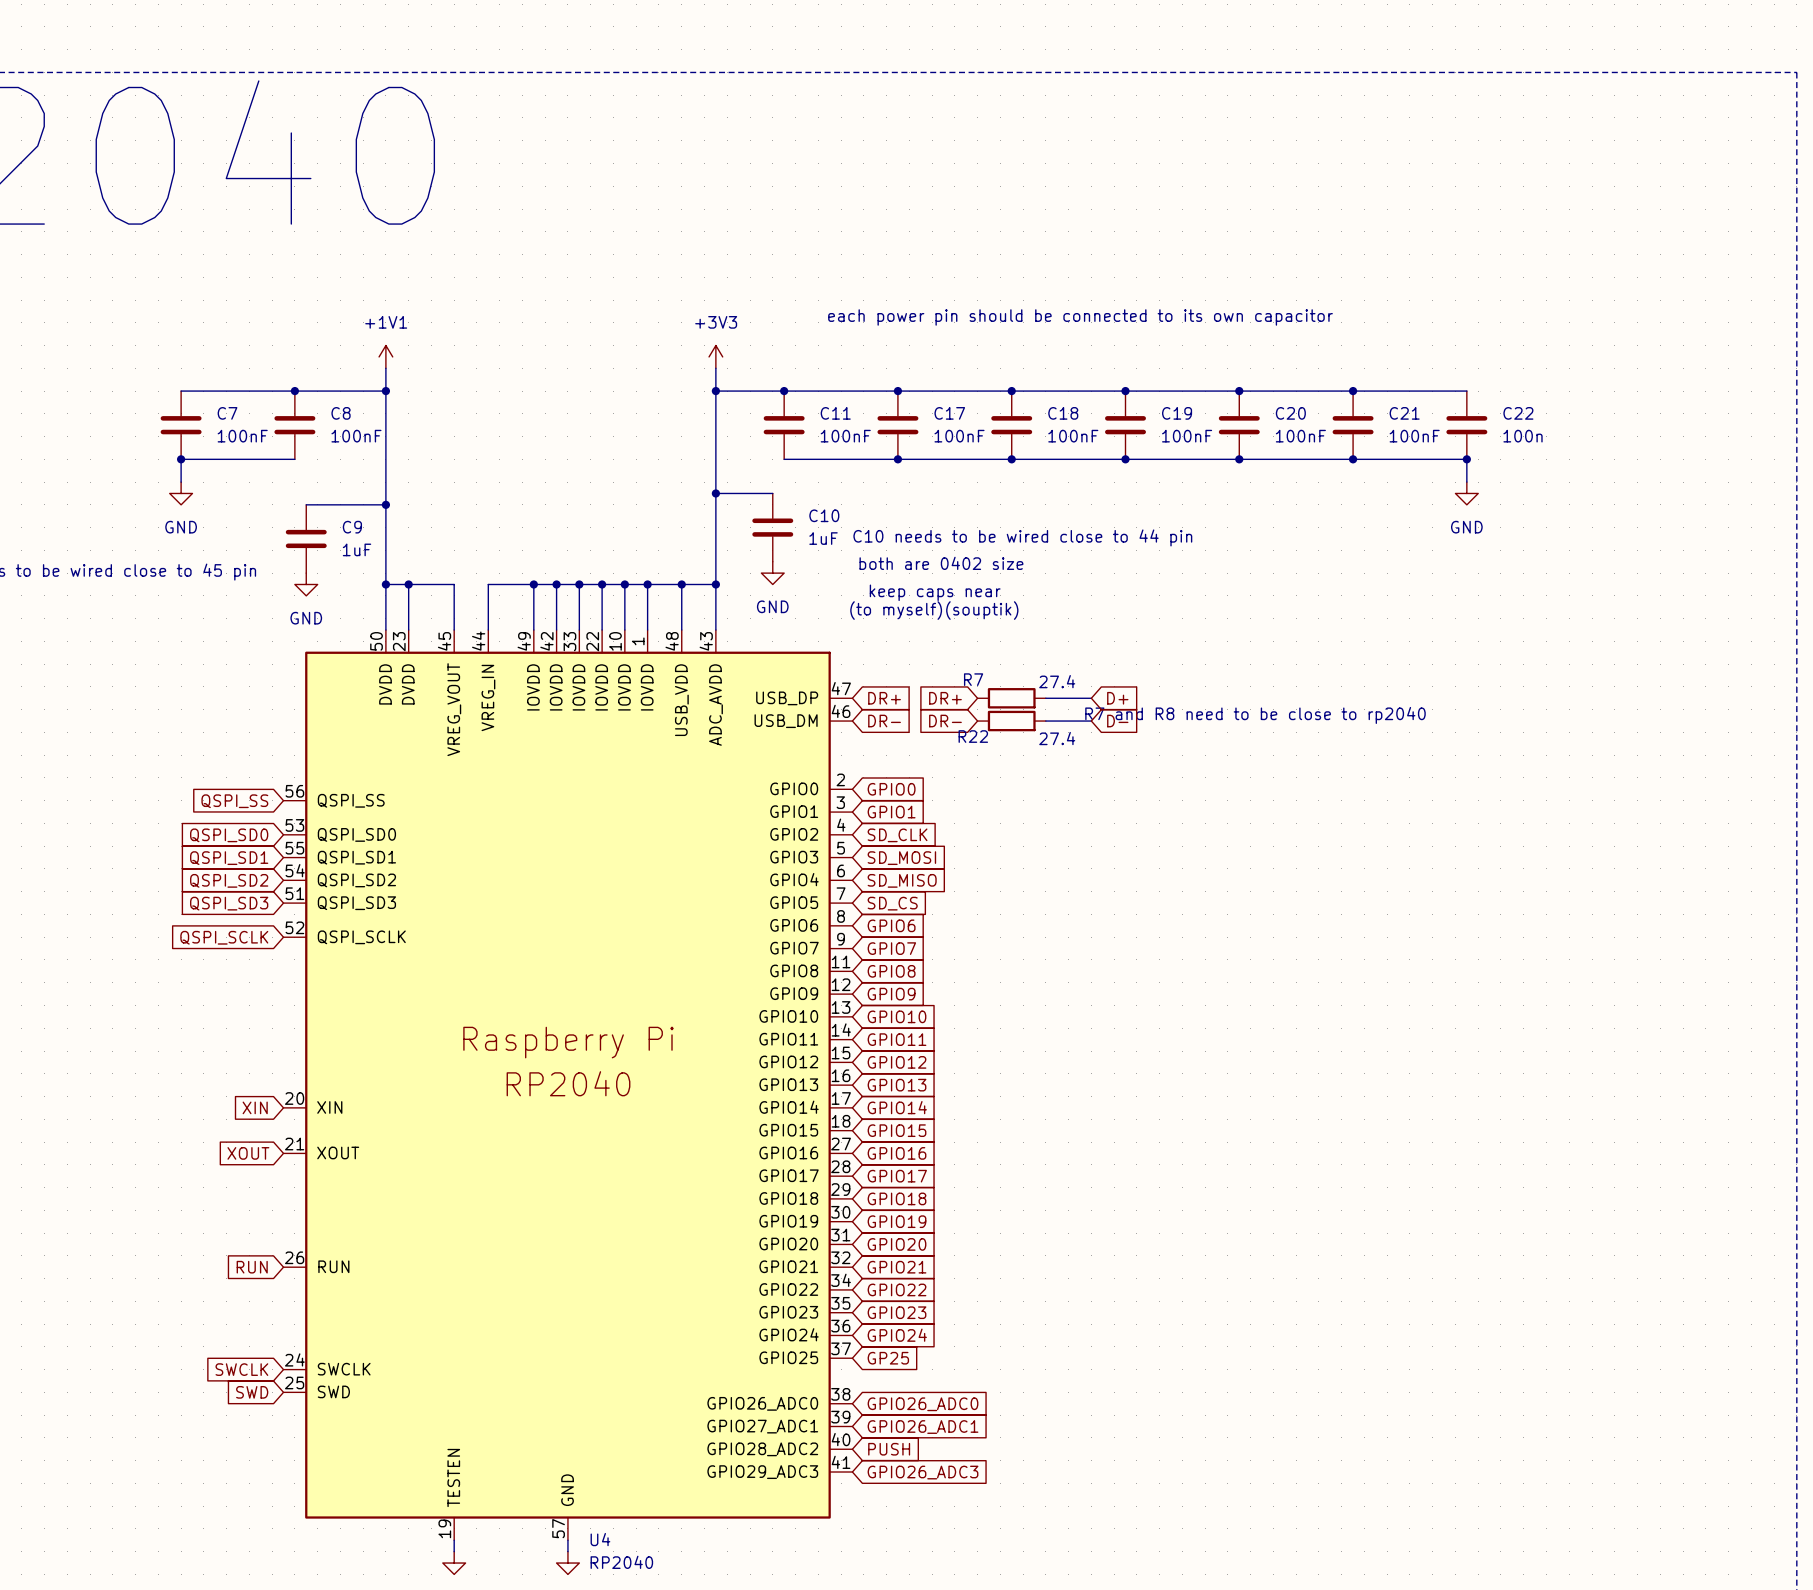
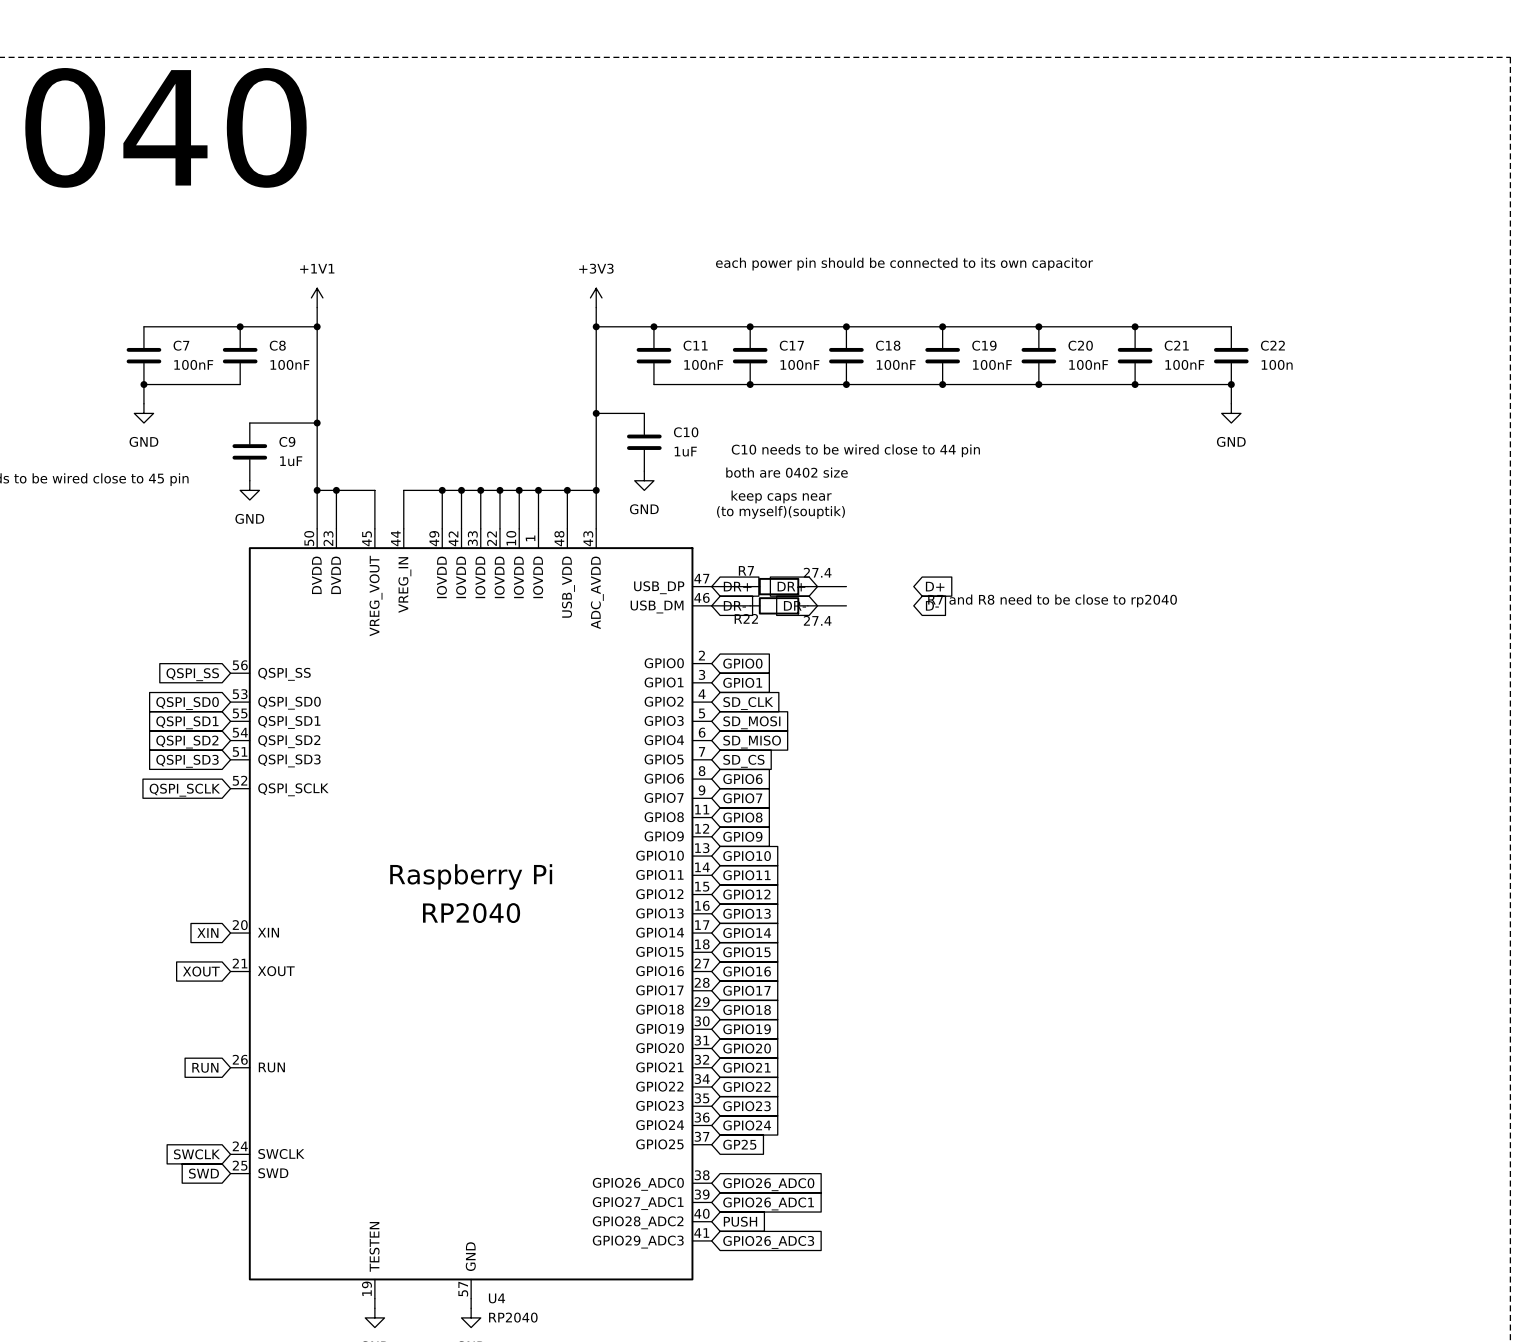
wire: none -> (711, 586) (750, 586)
R7 position: (1011, 698) -> (779, 586)
wire: (1045, 698) (1091, 698) -> (807, 586) (846, 586)
wire: none -> (711, 605) (750, 605)
R22 position: (1011, 721) -> (779, 605)
wire: (1045, 721) (1091, 721) -> (807, 605) (846, 605)

